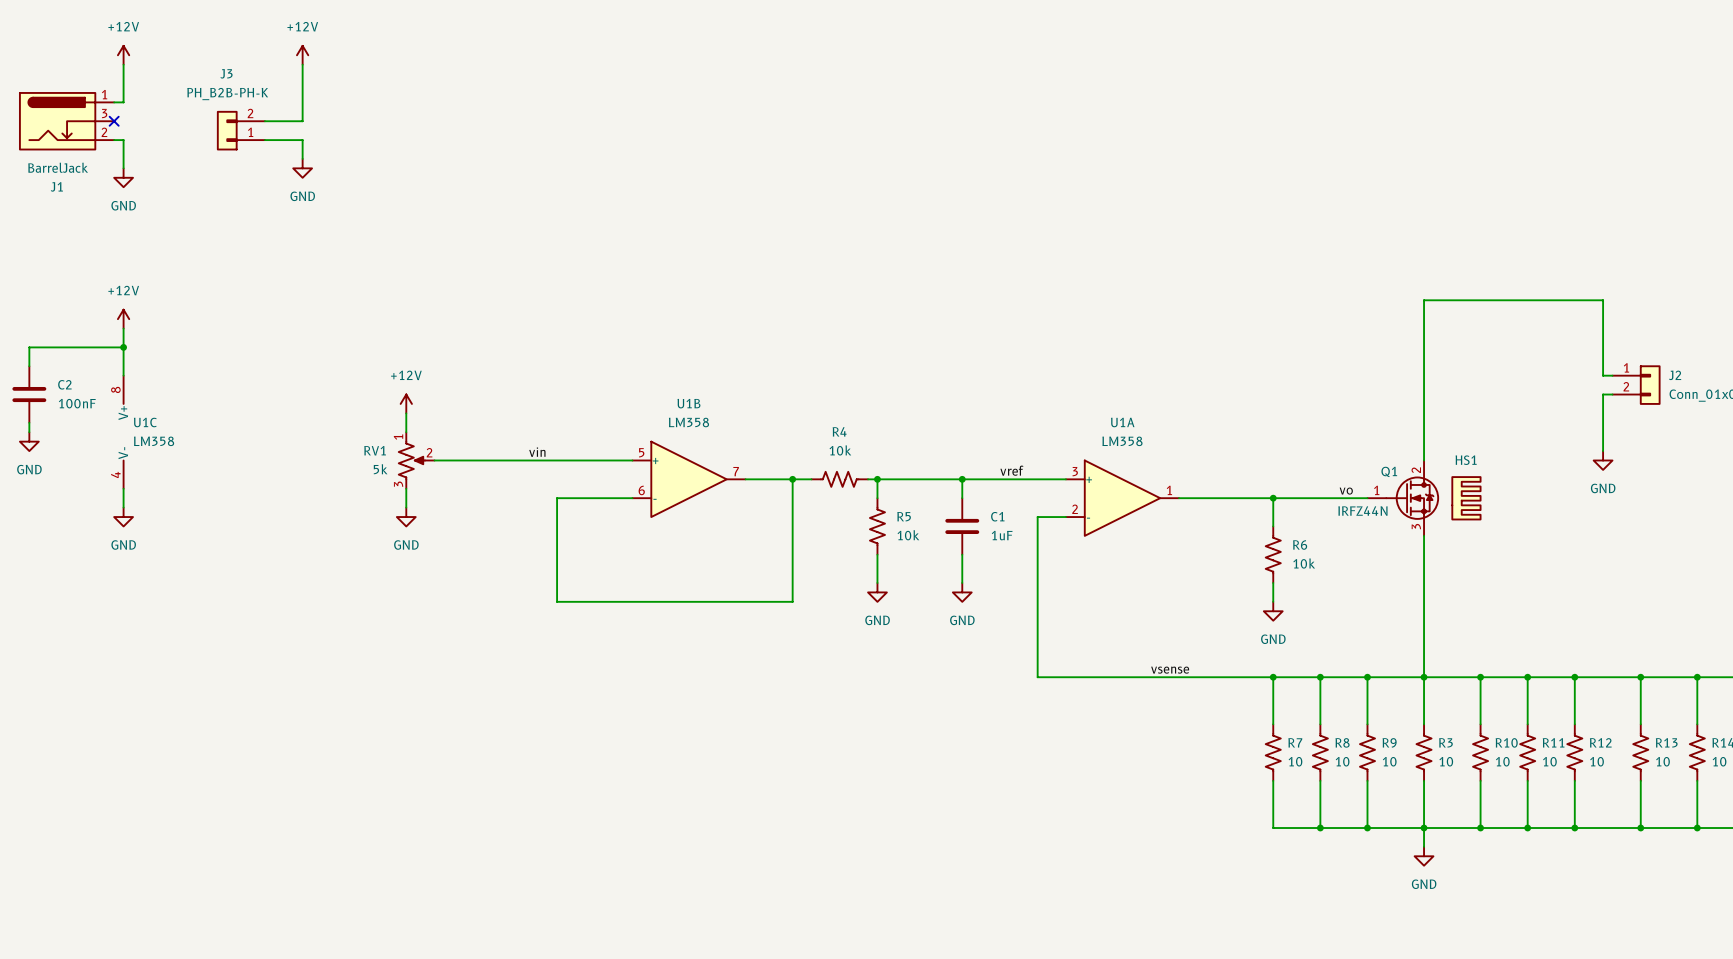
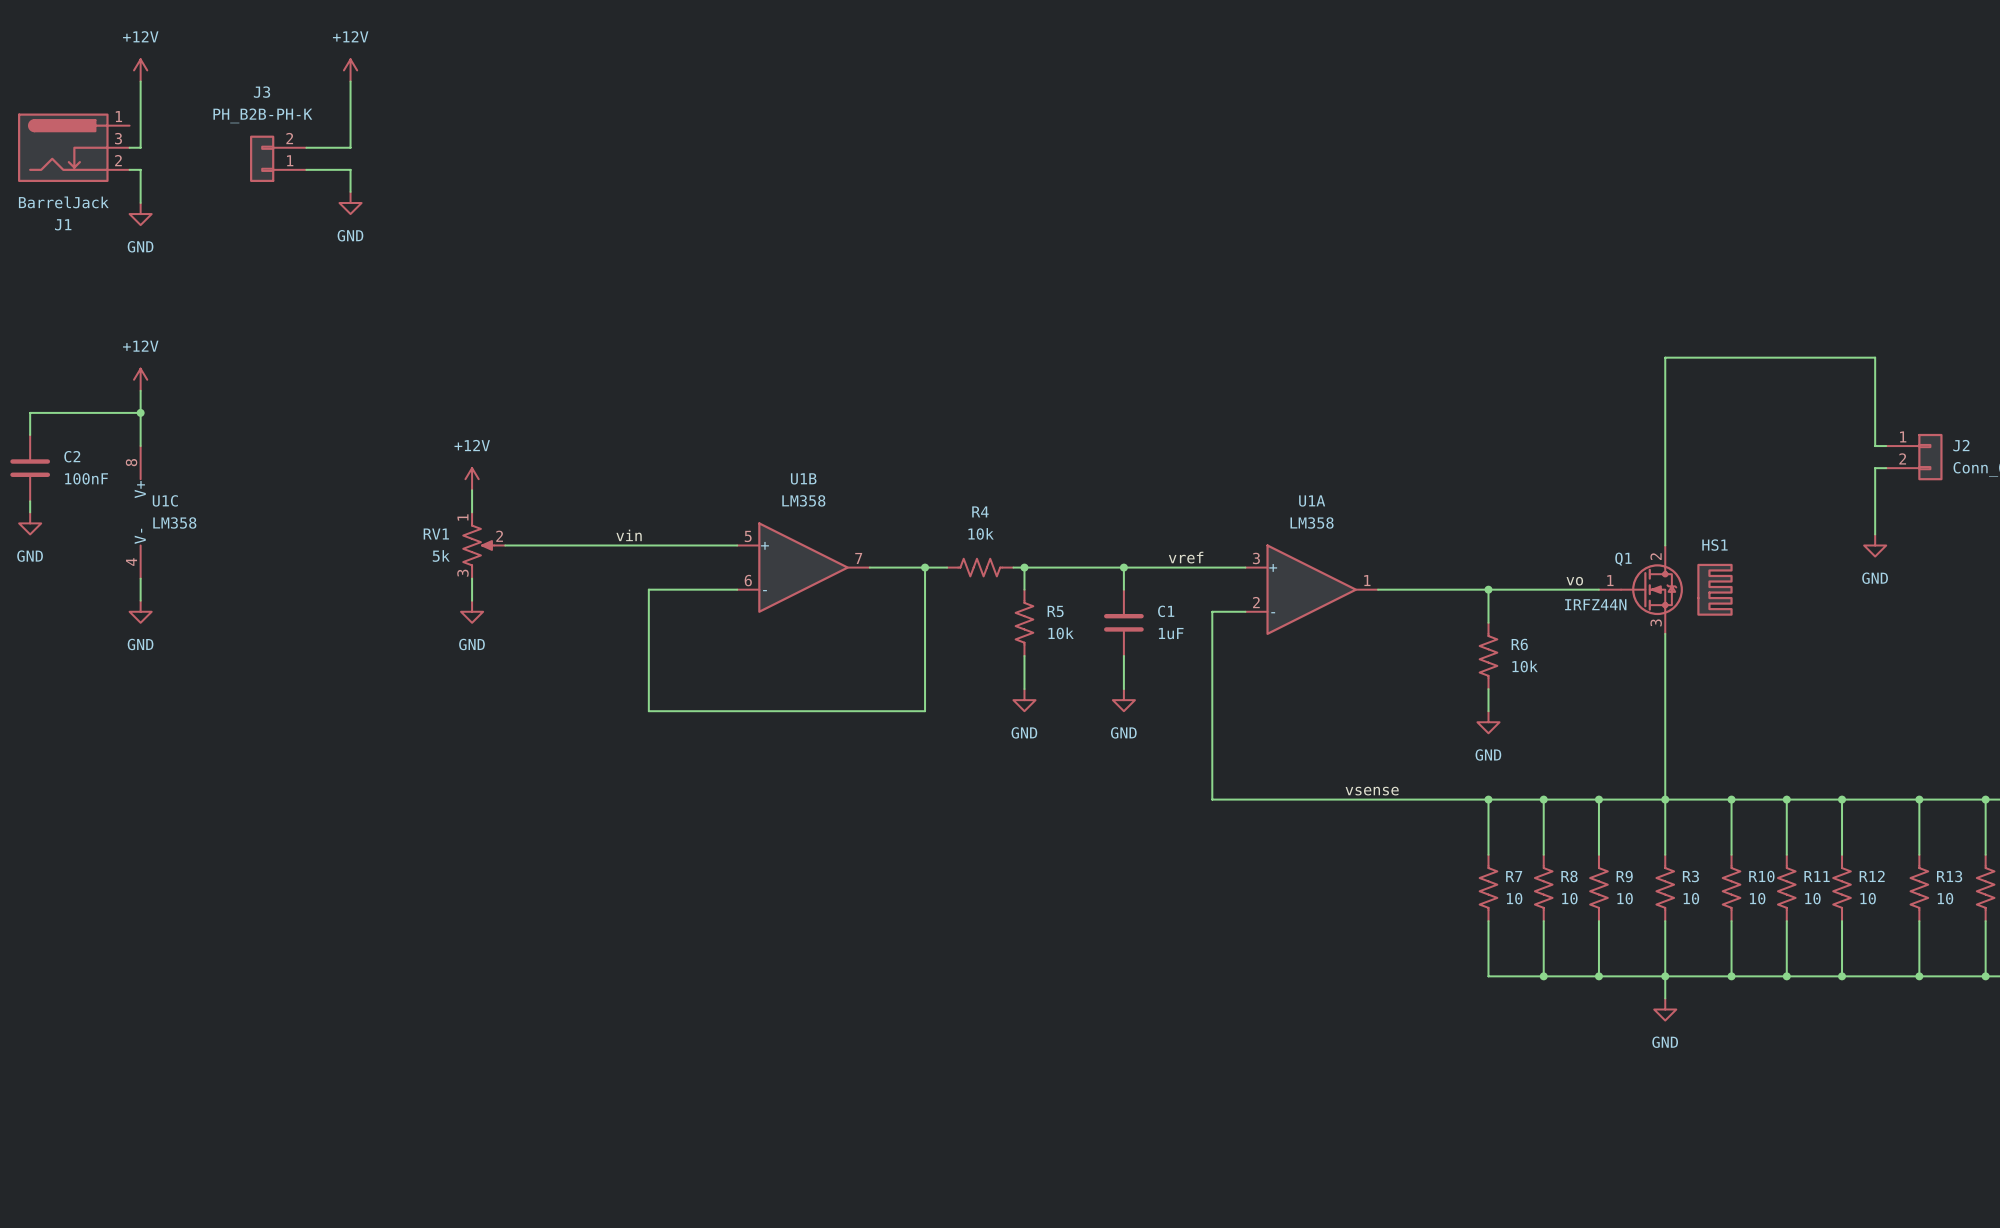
wire: (114, 102) (123, 102) -> (129, 147) (140, 147) (140, 125)
no-connect mark: (114, 121) -> none

